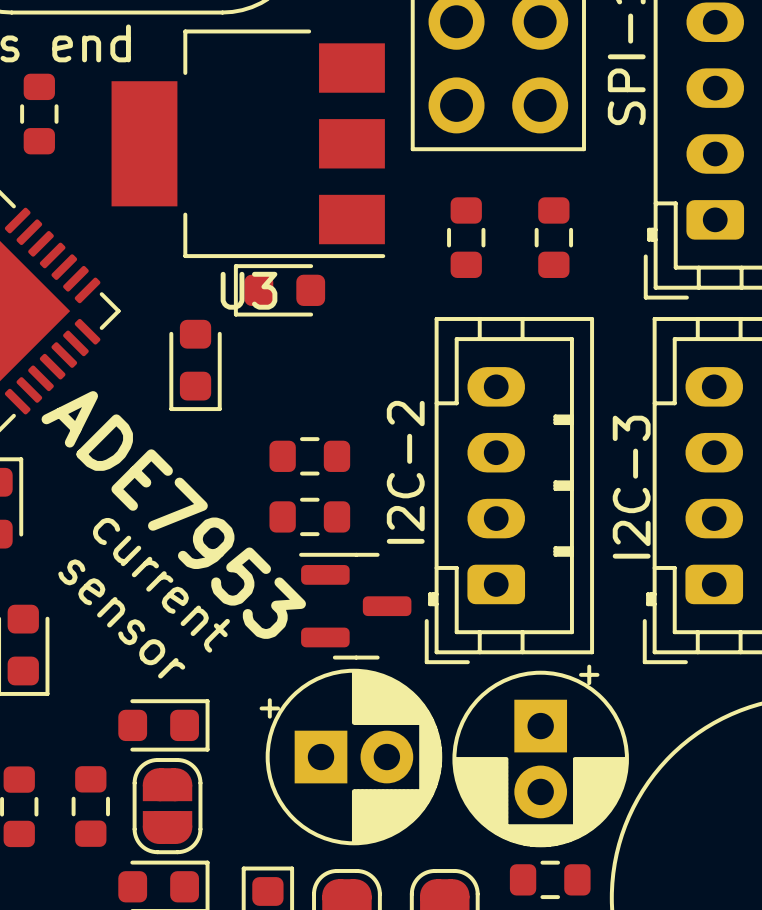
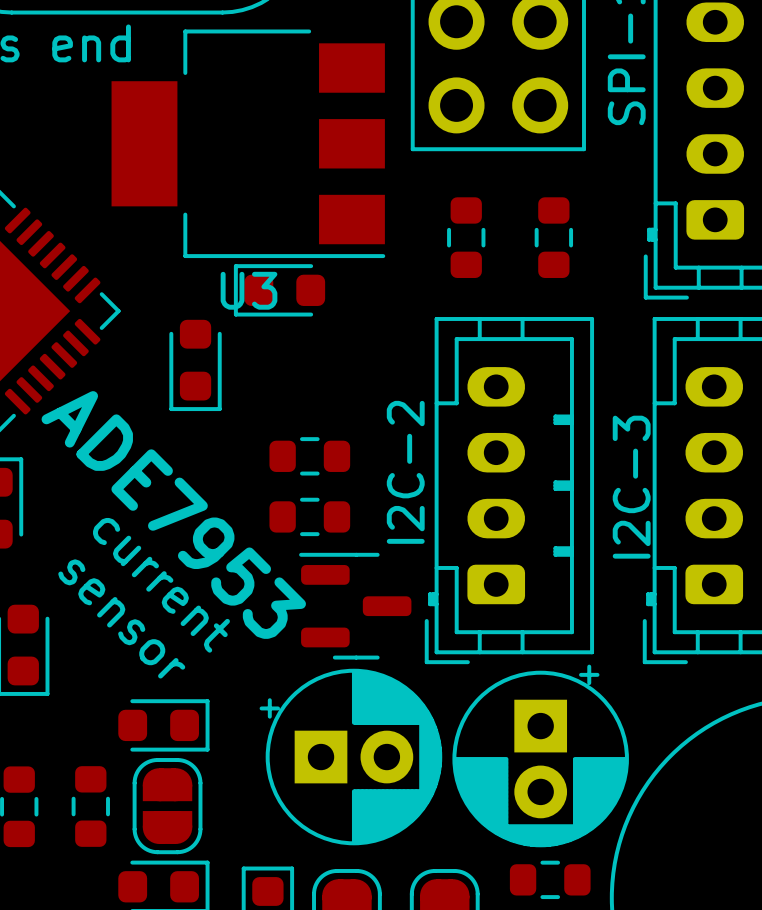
part: (39, 114) -> none

